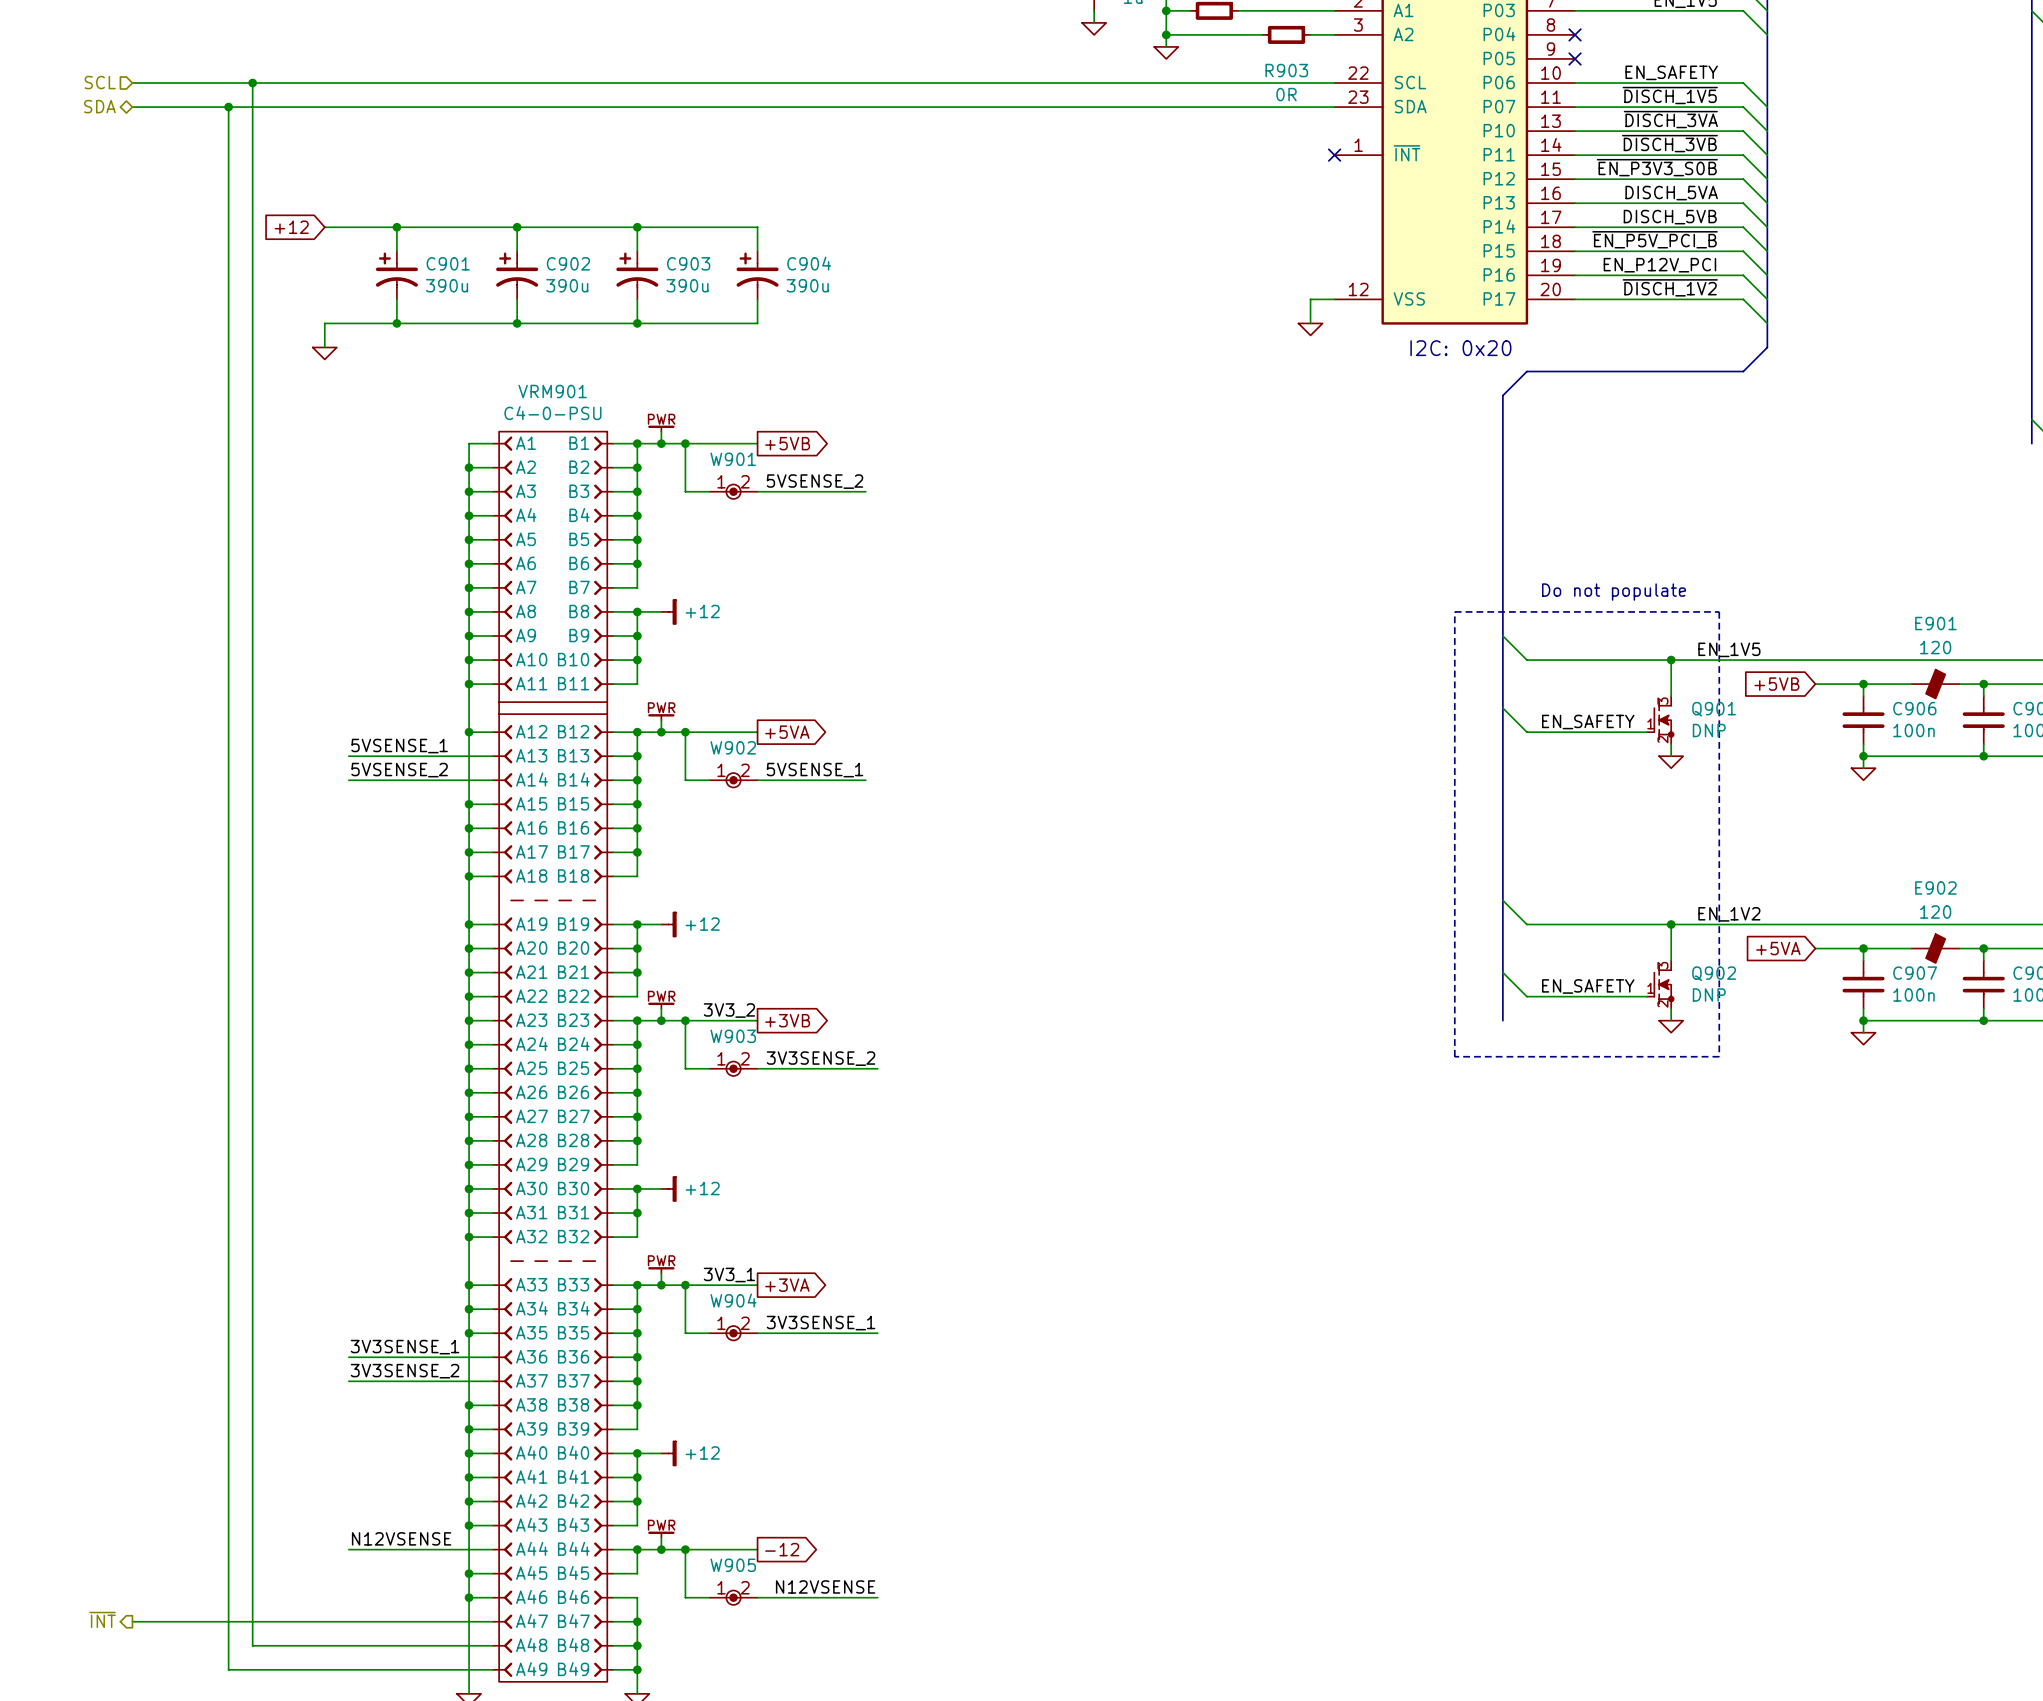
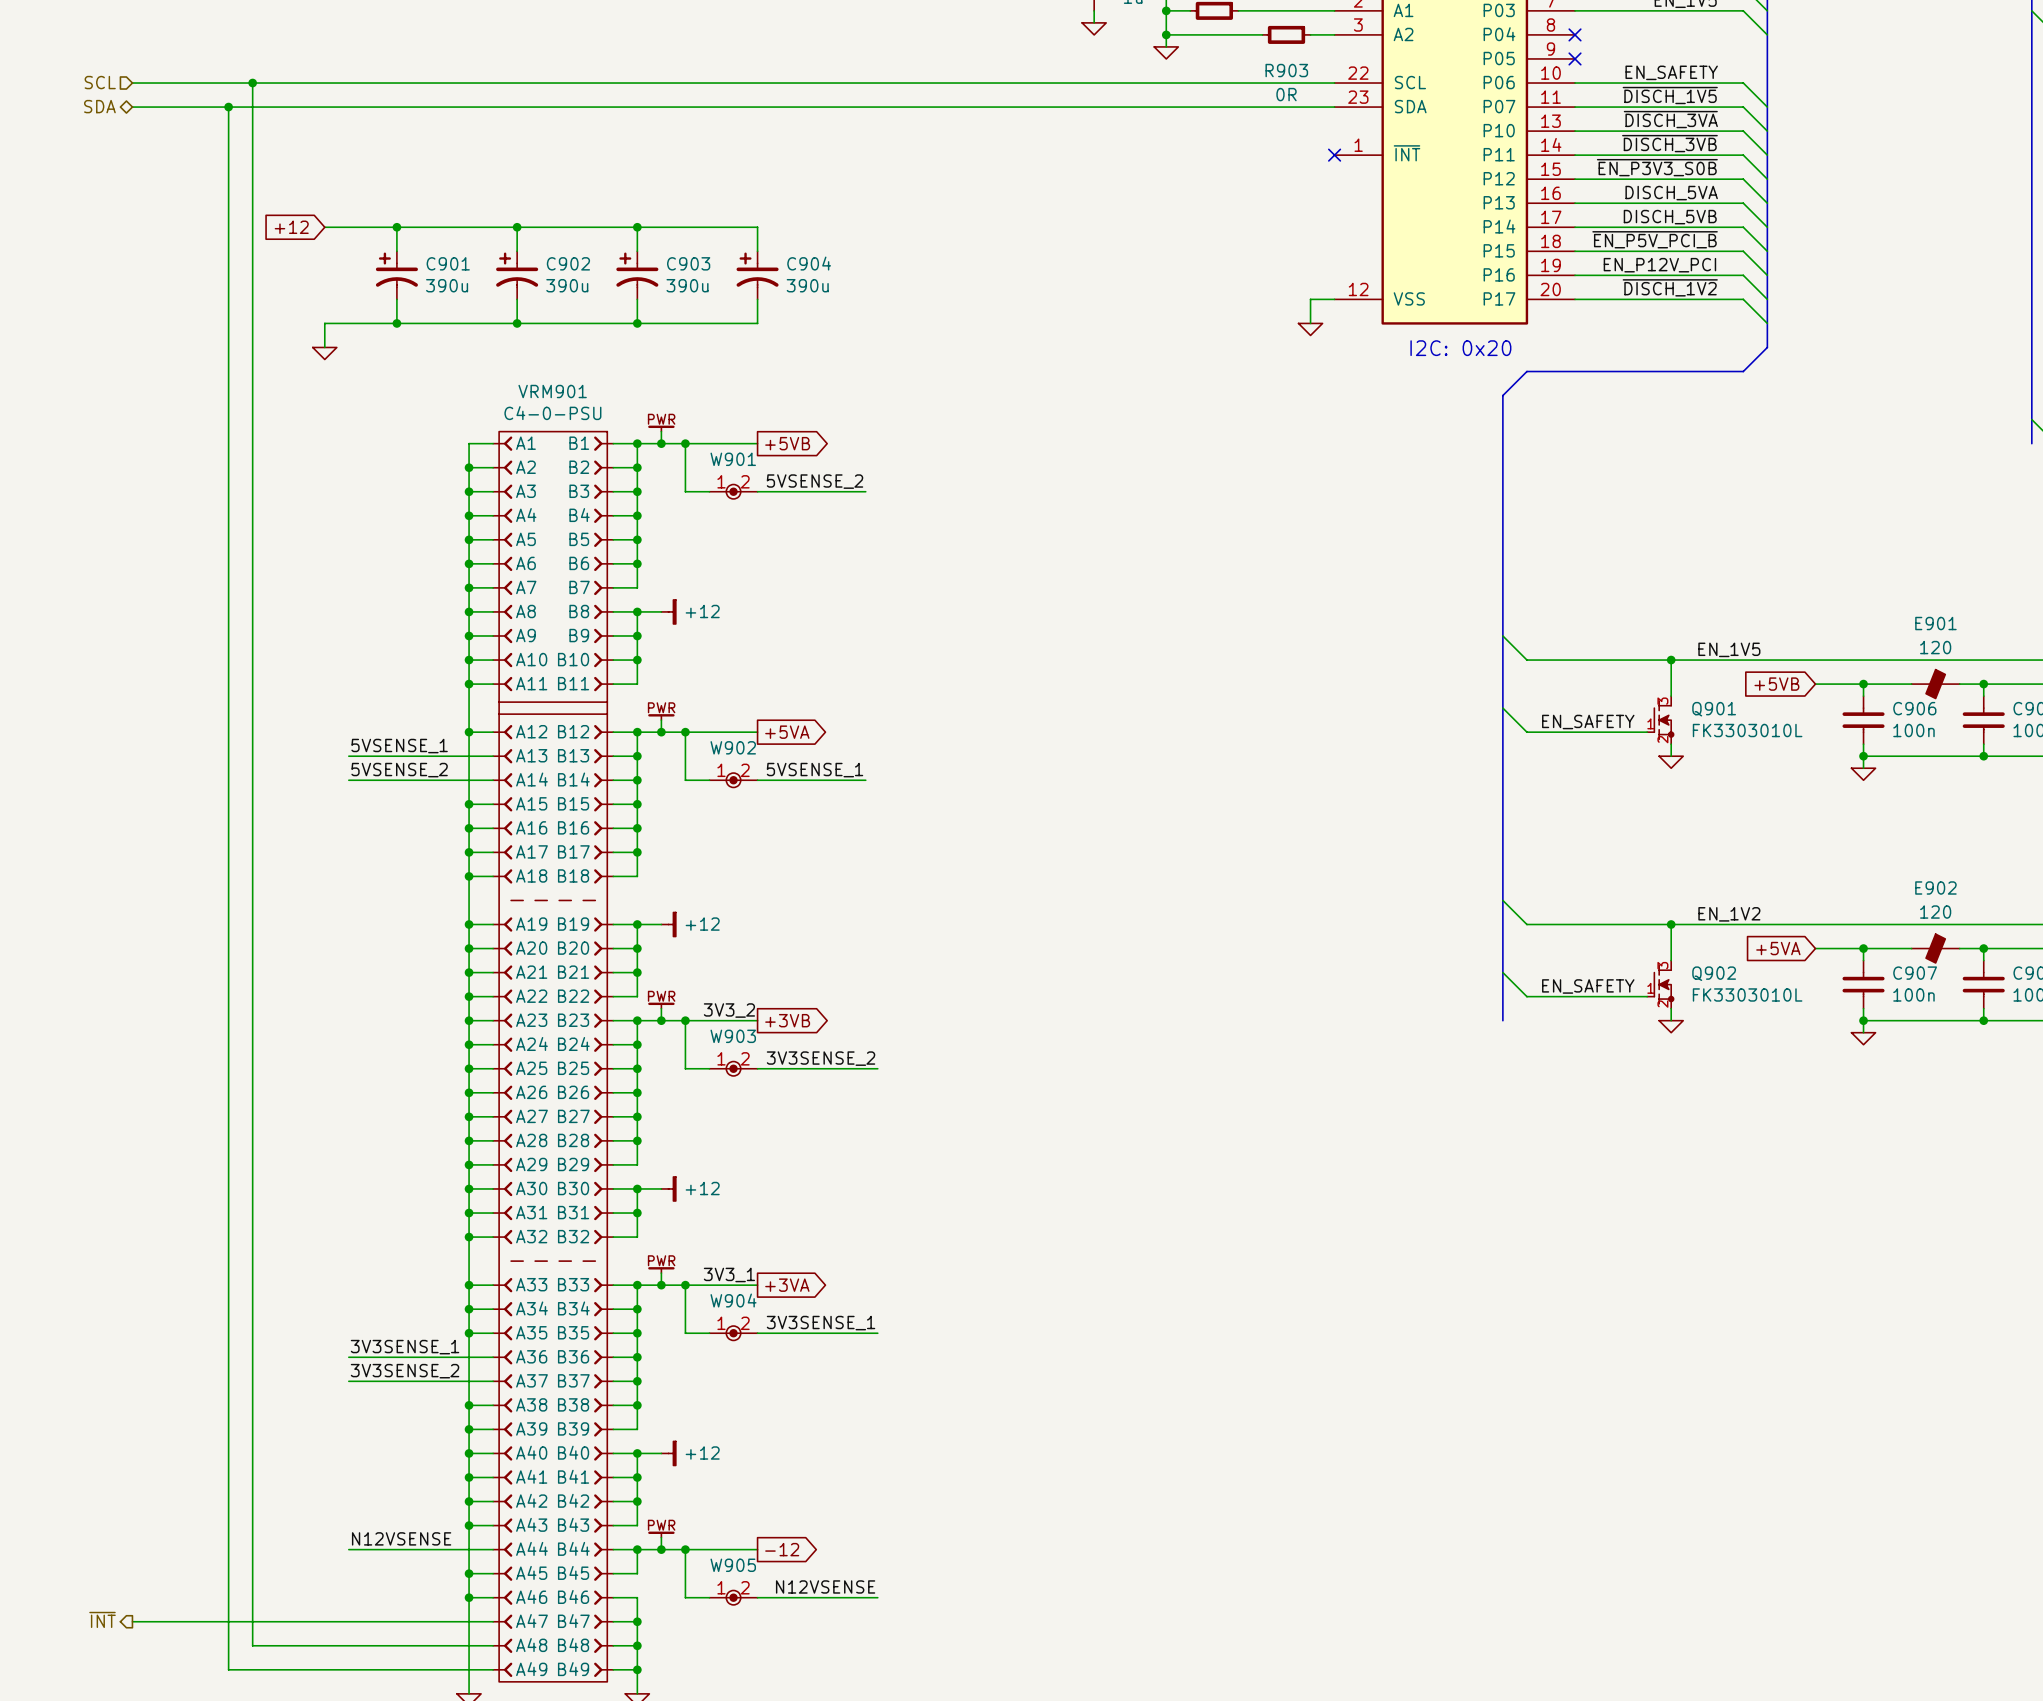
text: Do not populate (1614, 592) -> none
line: (1454, 611) (1454, 1056) (1719, 1056) (1719, 611) (1454, 611) -> none
Q901 value: DNP (1709, 730) -> FK3303010L (1747, 730)
Q902 value: DNP (1709, 994) -> FK3303010L (1747, 994)

